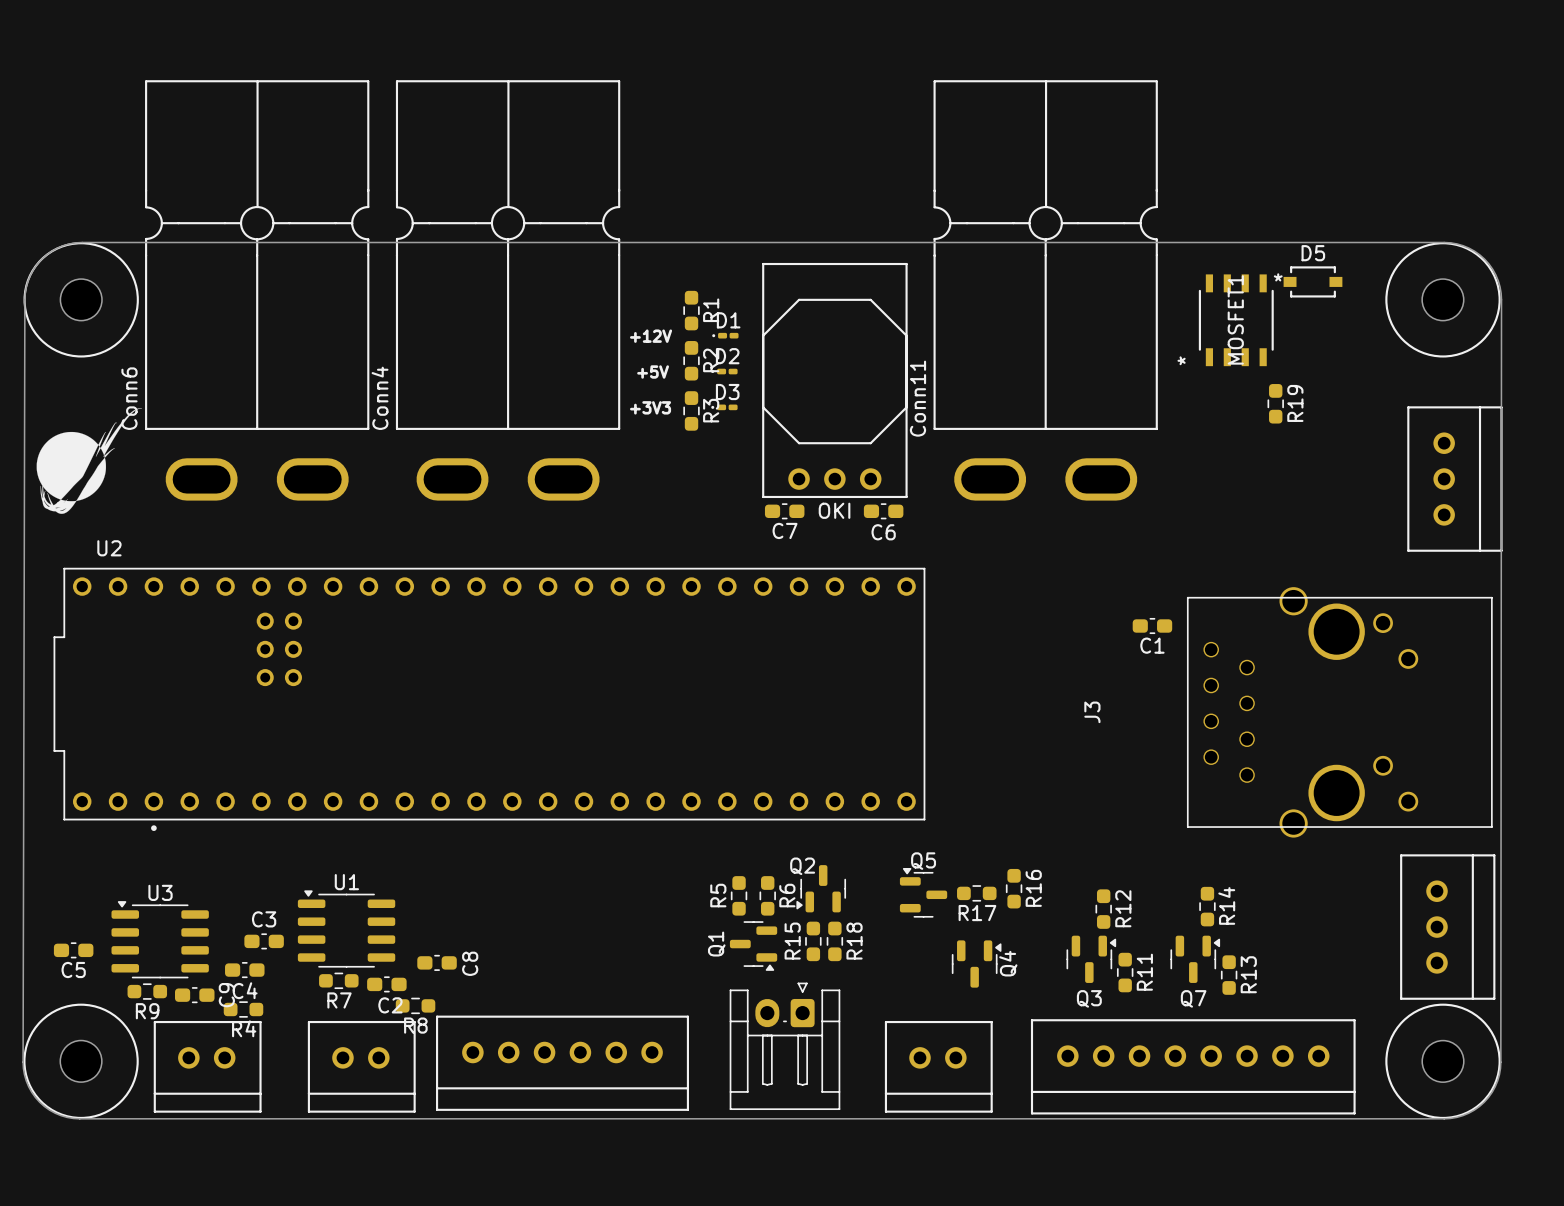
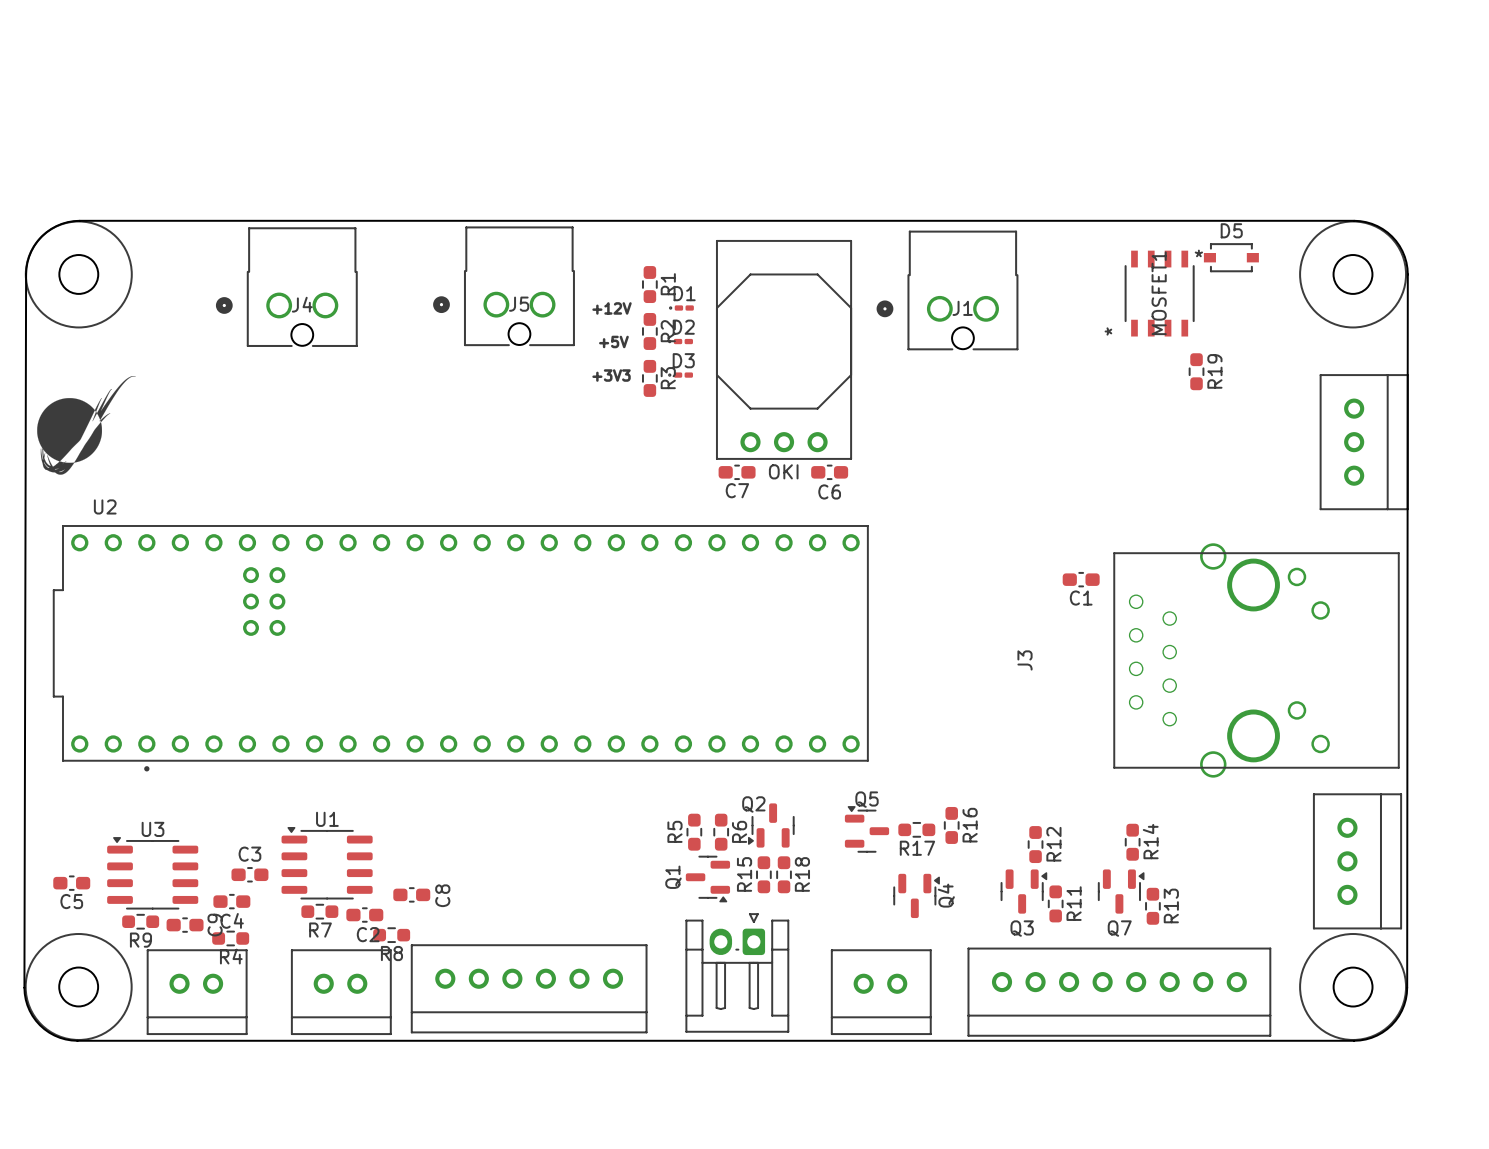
Conn6: (257, 290) -> none
Conn4: (508, 290) -> none
Conn11: (1045, 290) -> none
J5: none -> (504, 286)
J4: none -> (286, 287)
J1: none -> (947, 290)

